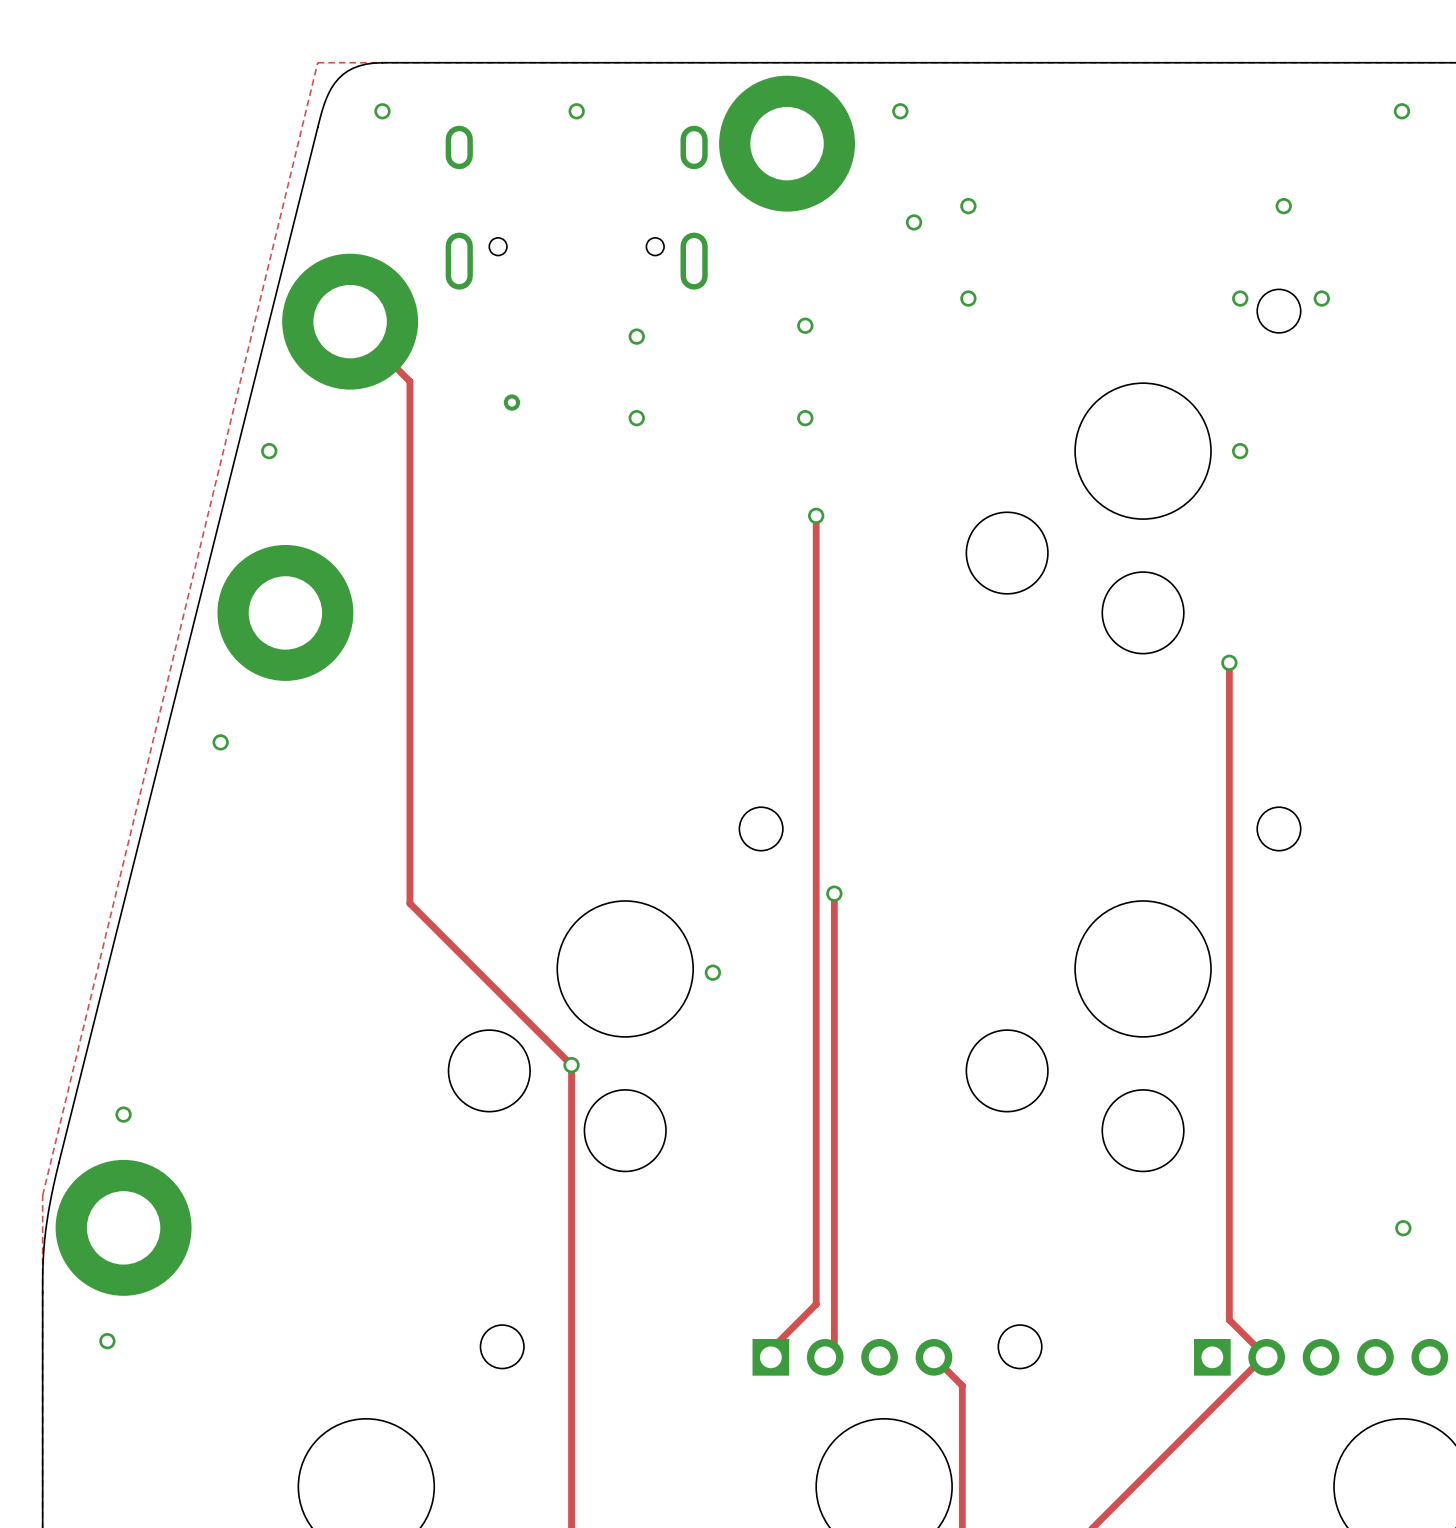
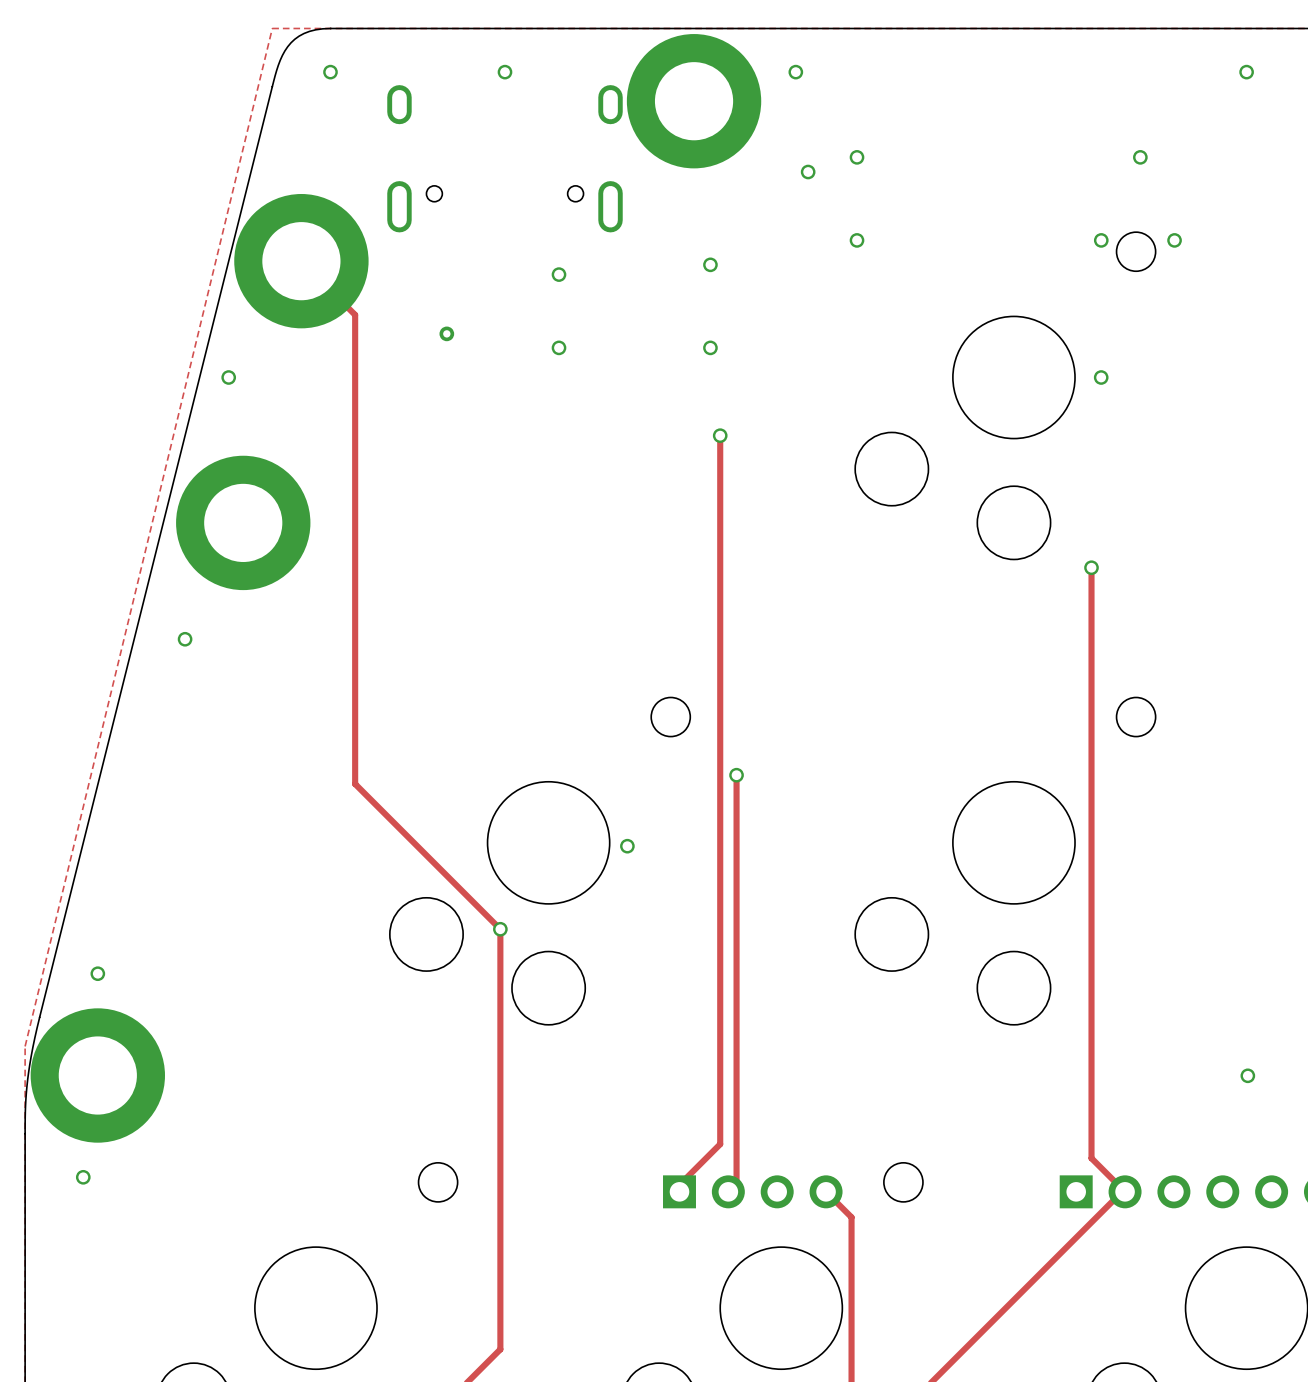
part footprint: [719, 75, 856, 212] -> [626, 34, 762, 169]
part footprint: [282, 253, 419, 390] -> [234, 193, 369, 329]
part footprint: [217, 544, 354, 681] -> [176, 455, 311, 591]
part footprint: [55, 1159, 192, 1296] -> [30, 1008, 166, 1143]

